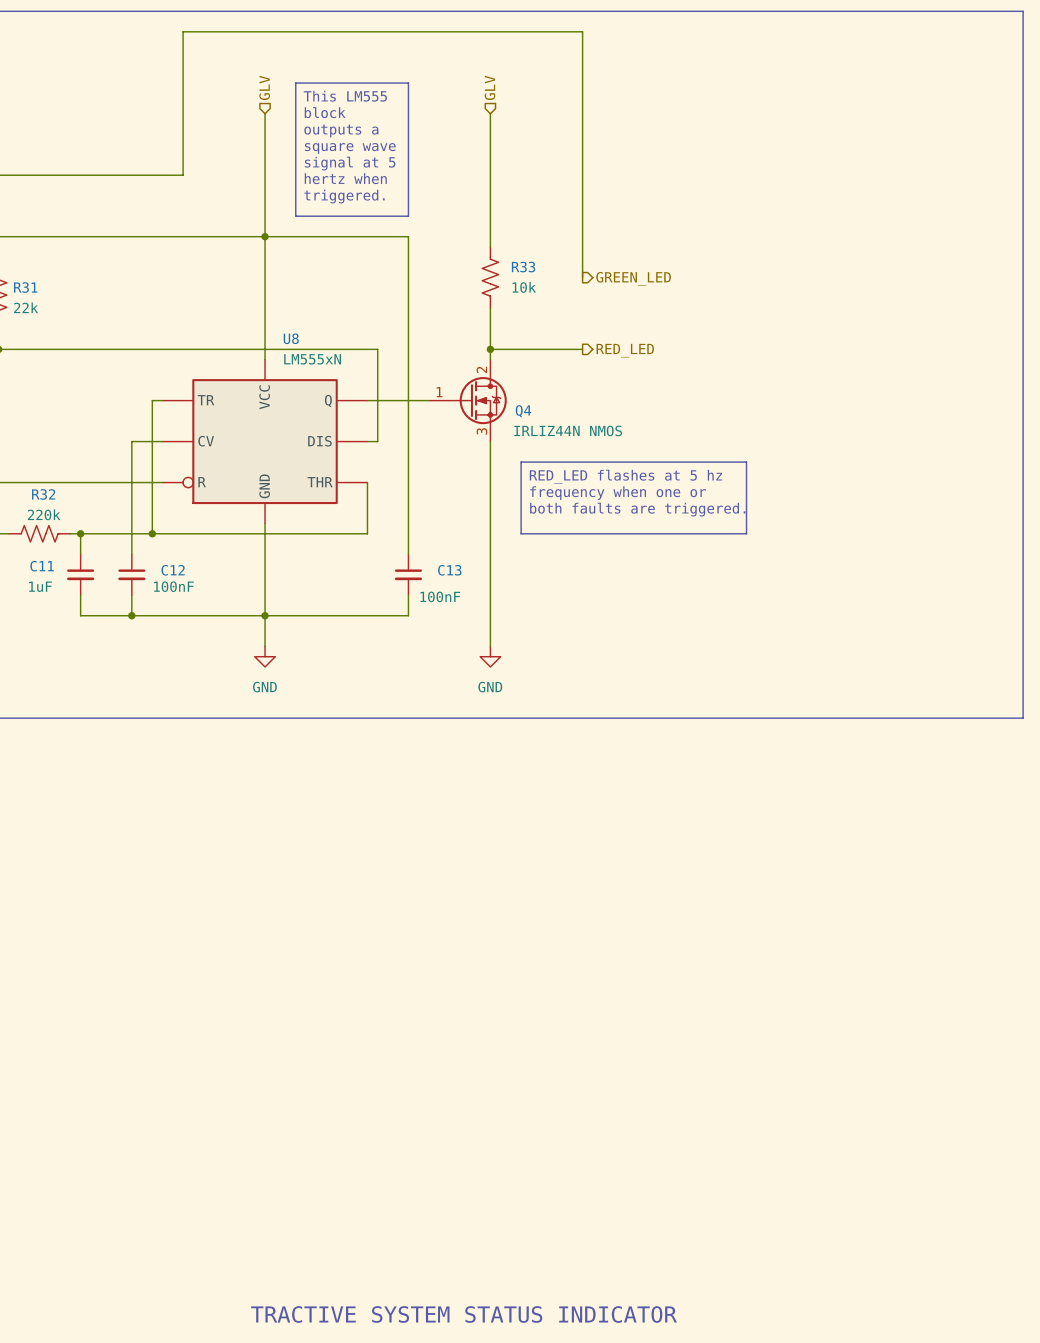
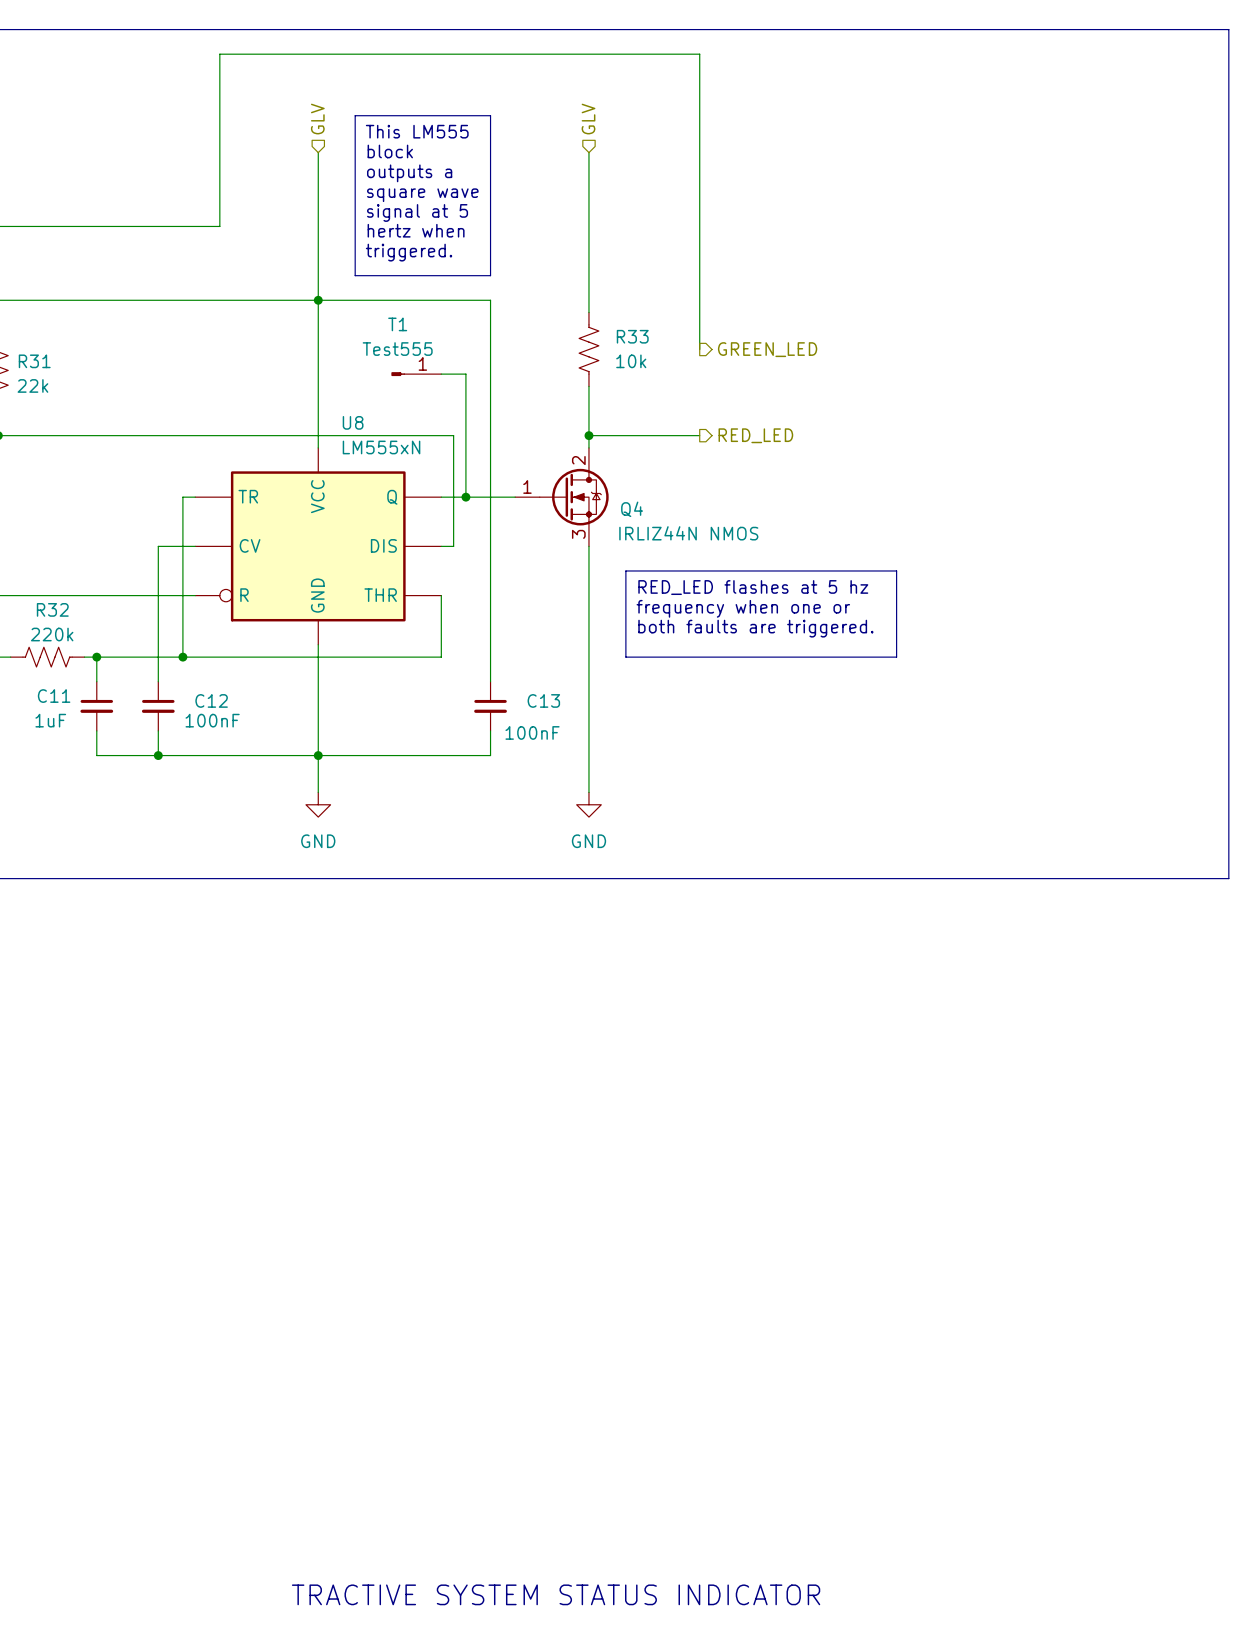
T1: none -> Test555 (416, 374)
wire: none -> (441, 374) (465, 374) (465, 497)
junction: none -> (465, 497)

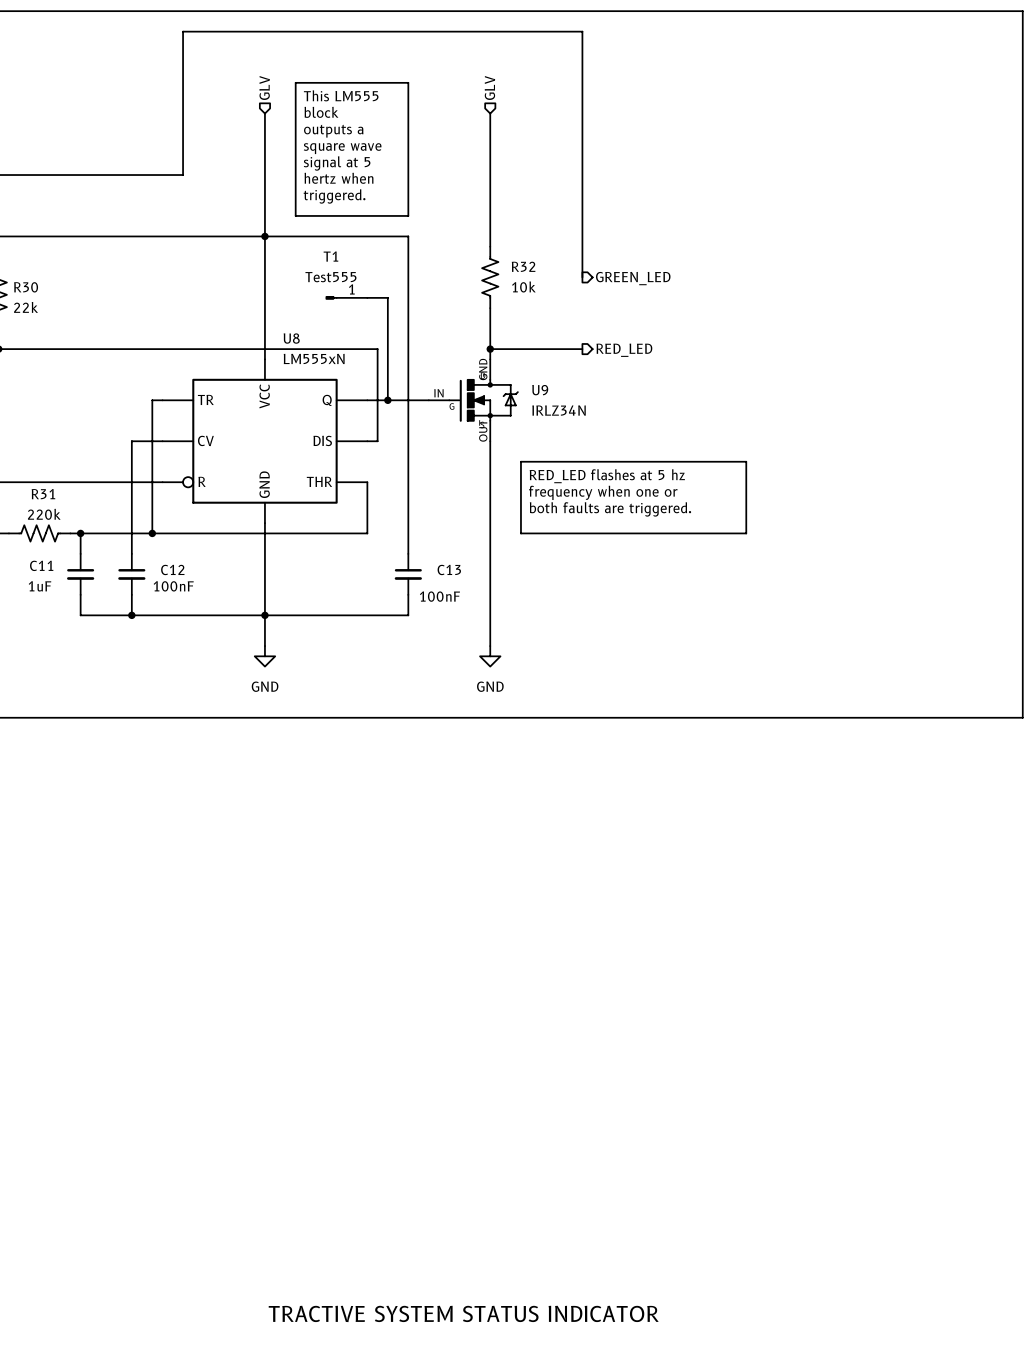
R33 name: R33 (632, 336) -> R32 (523, 266)
R31 name: R31 (34, 361) -> R30 (26, 287)
Q4: IRLIZ44N NMOS (561, 497) -> none
U9: none -> IRLZ34N (473, 400)
R32 name: R32 (52, 609) -> R31 (43, 494)

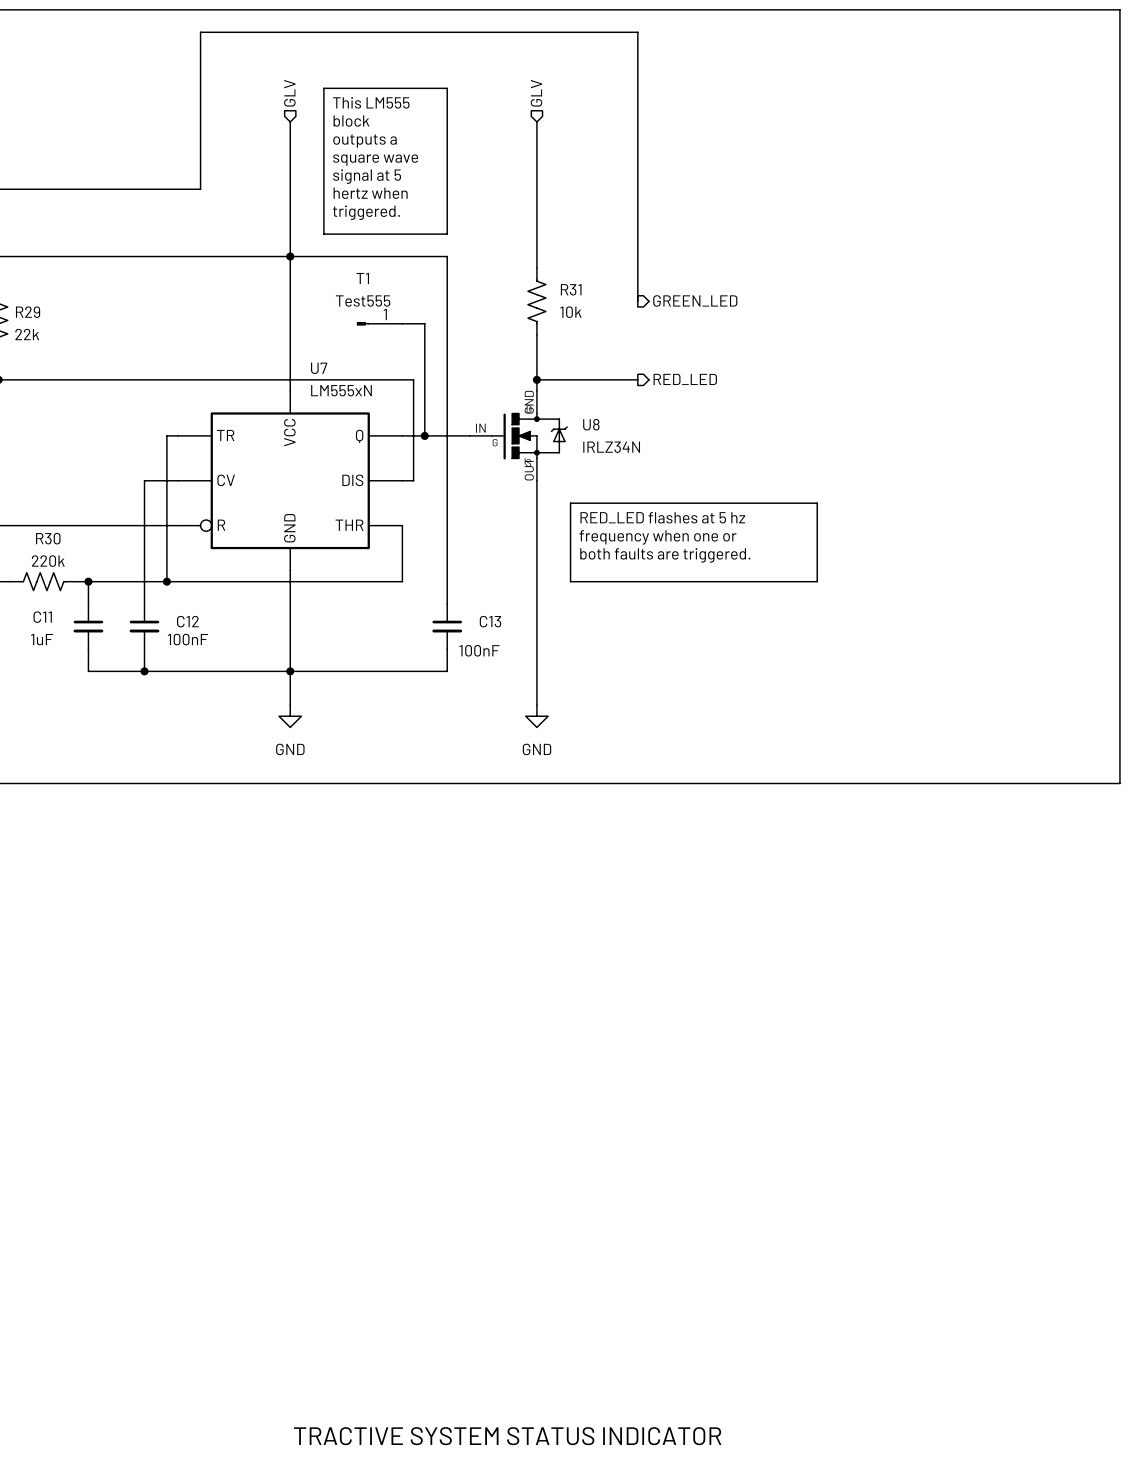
R32 name: R32 (523, 266) -> R31 (571, 289)
R30 name: R30 (26, 287) -> R29 (28, 312)
U8 name: U8 (291, 338) -> U7 (319, 368)
U9 name: U9 (540, 390) -> U8 (591, 424)
R31 name: R31 (43, 494) -> R30 (48, 538)

